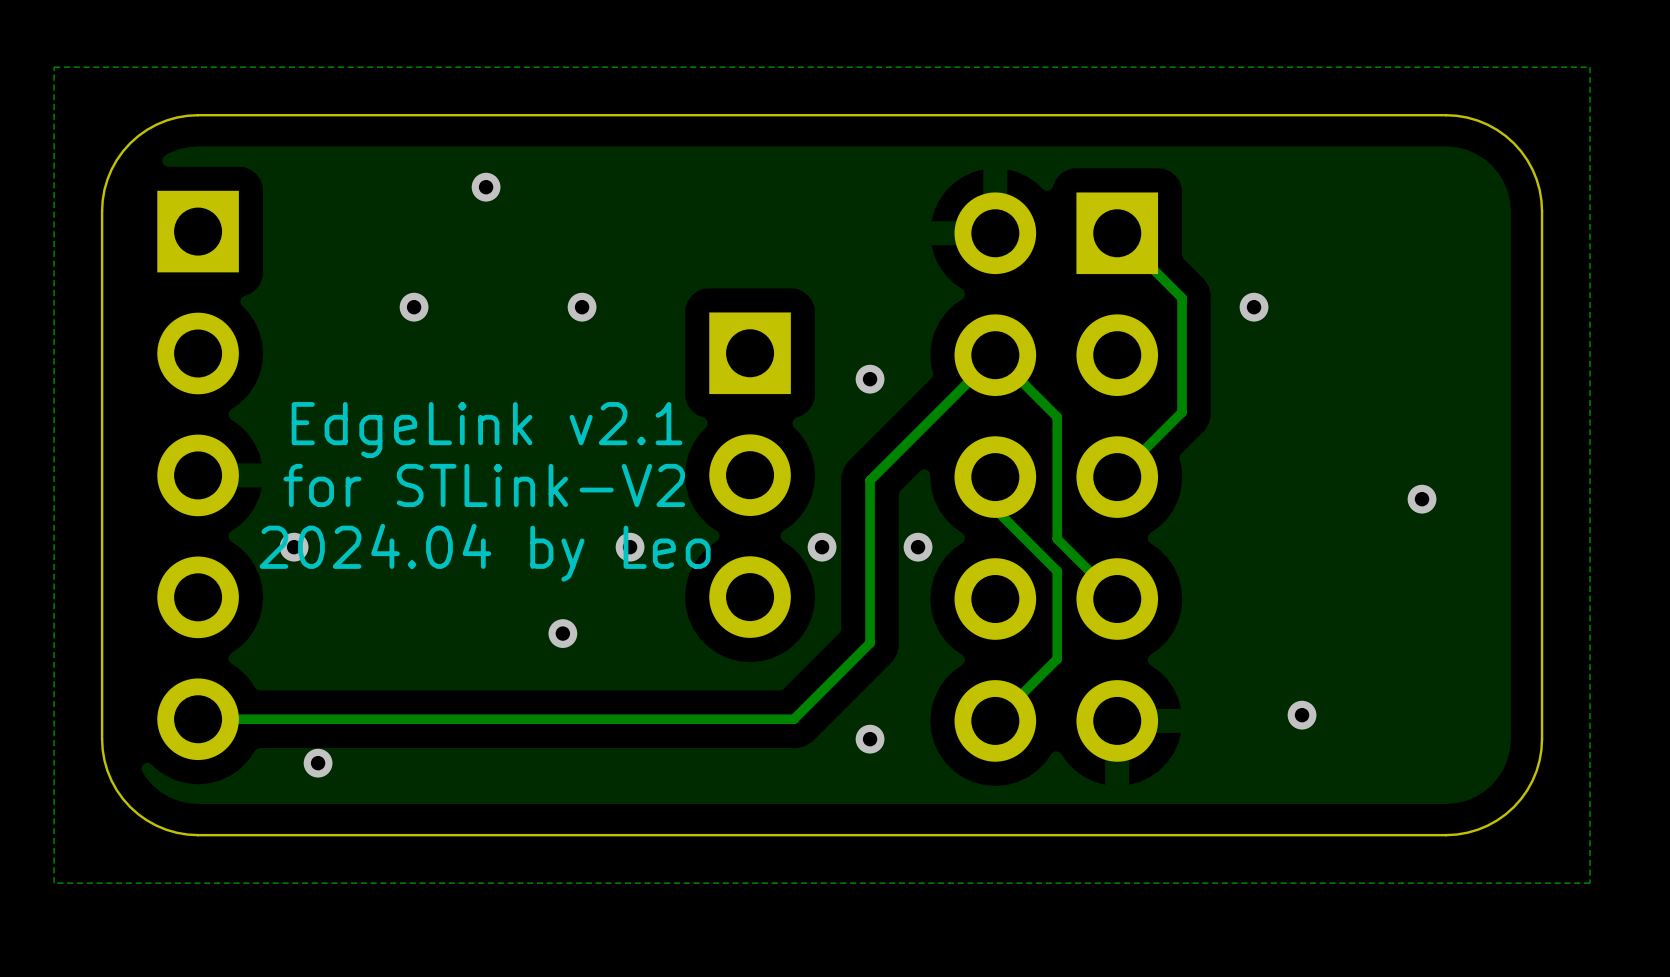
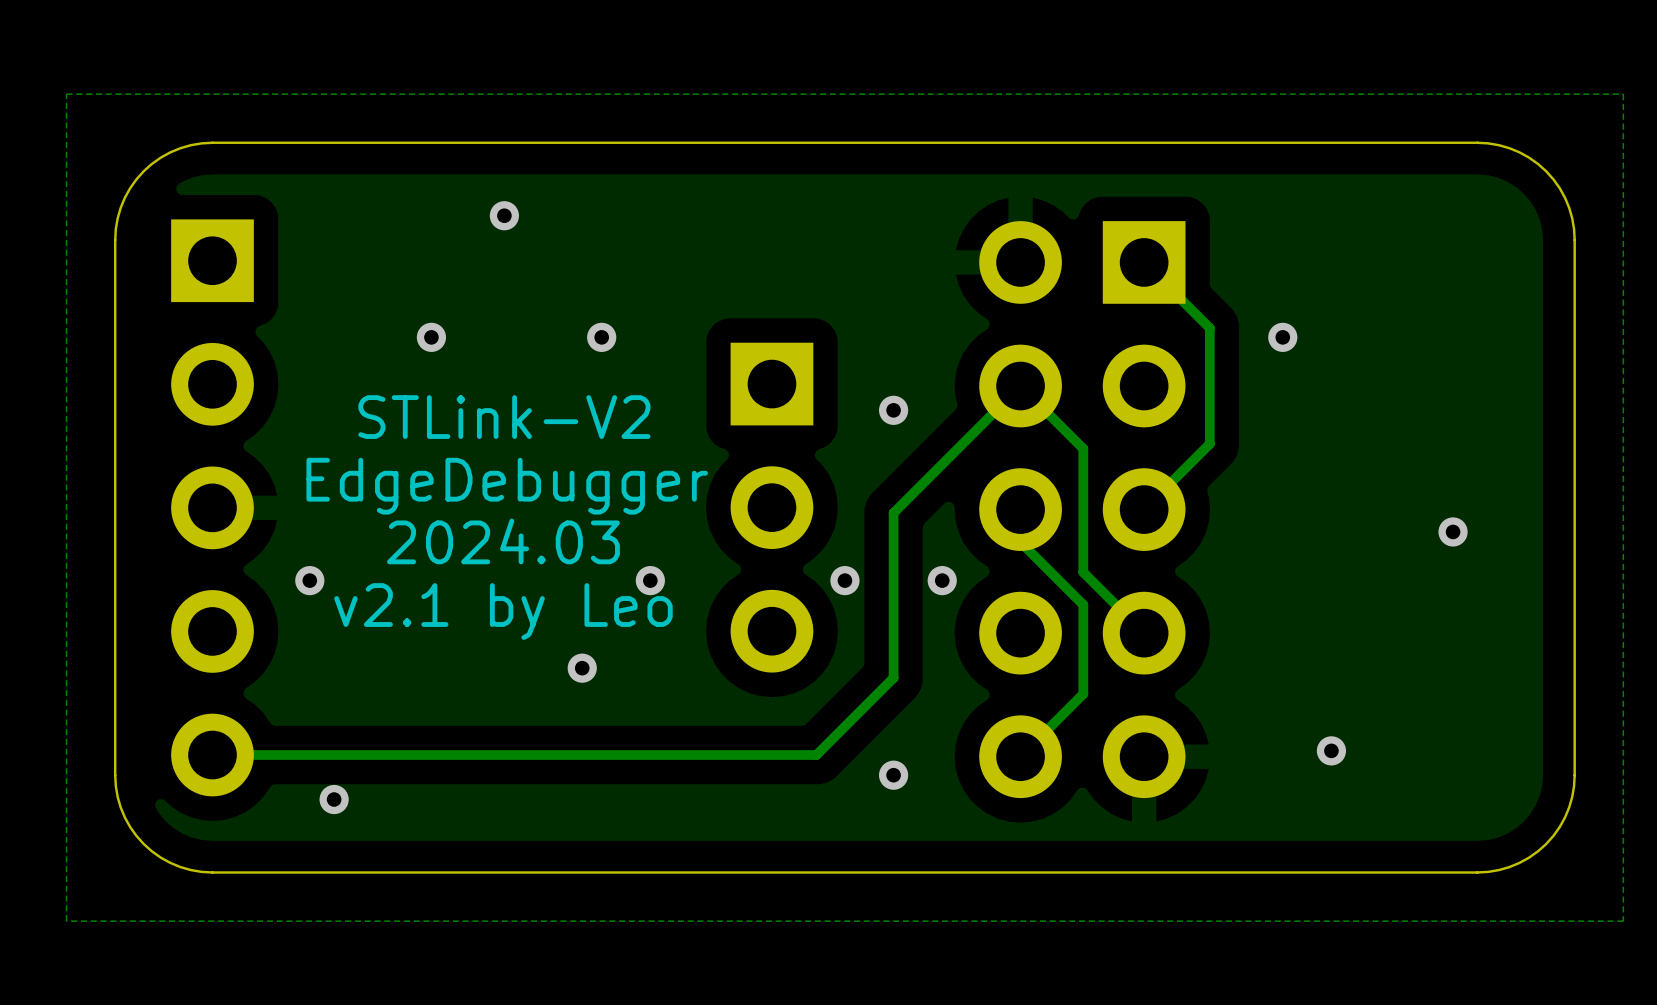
text: none -> STLink-V2 (504, 417)
text: EdgeLink v2.1 (486, 430) -> none
text: none -> EdgeDebugger (507, 486)
text: for STLink-V2 (484, 485) -> none
text: none -> 2024.03 (503, 541)
text: 2024.04 by Leo (485, 552) -> v2.1 by Leo (503, 611)

